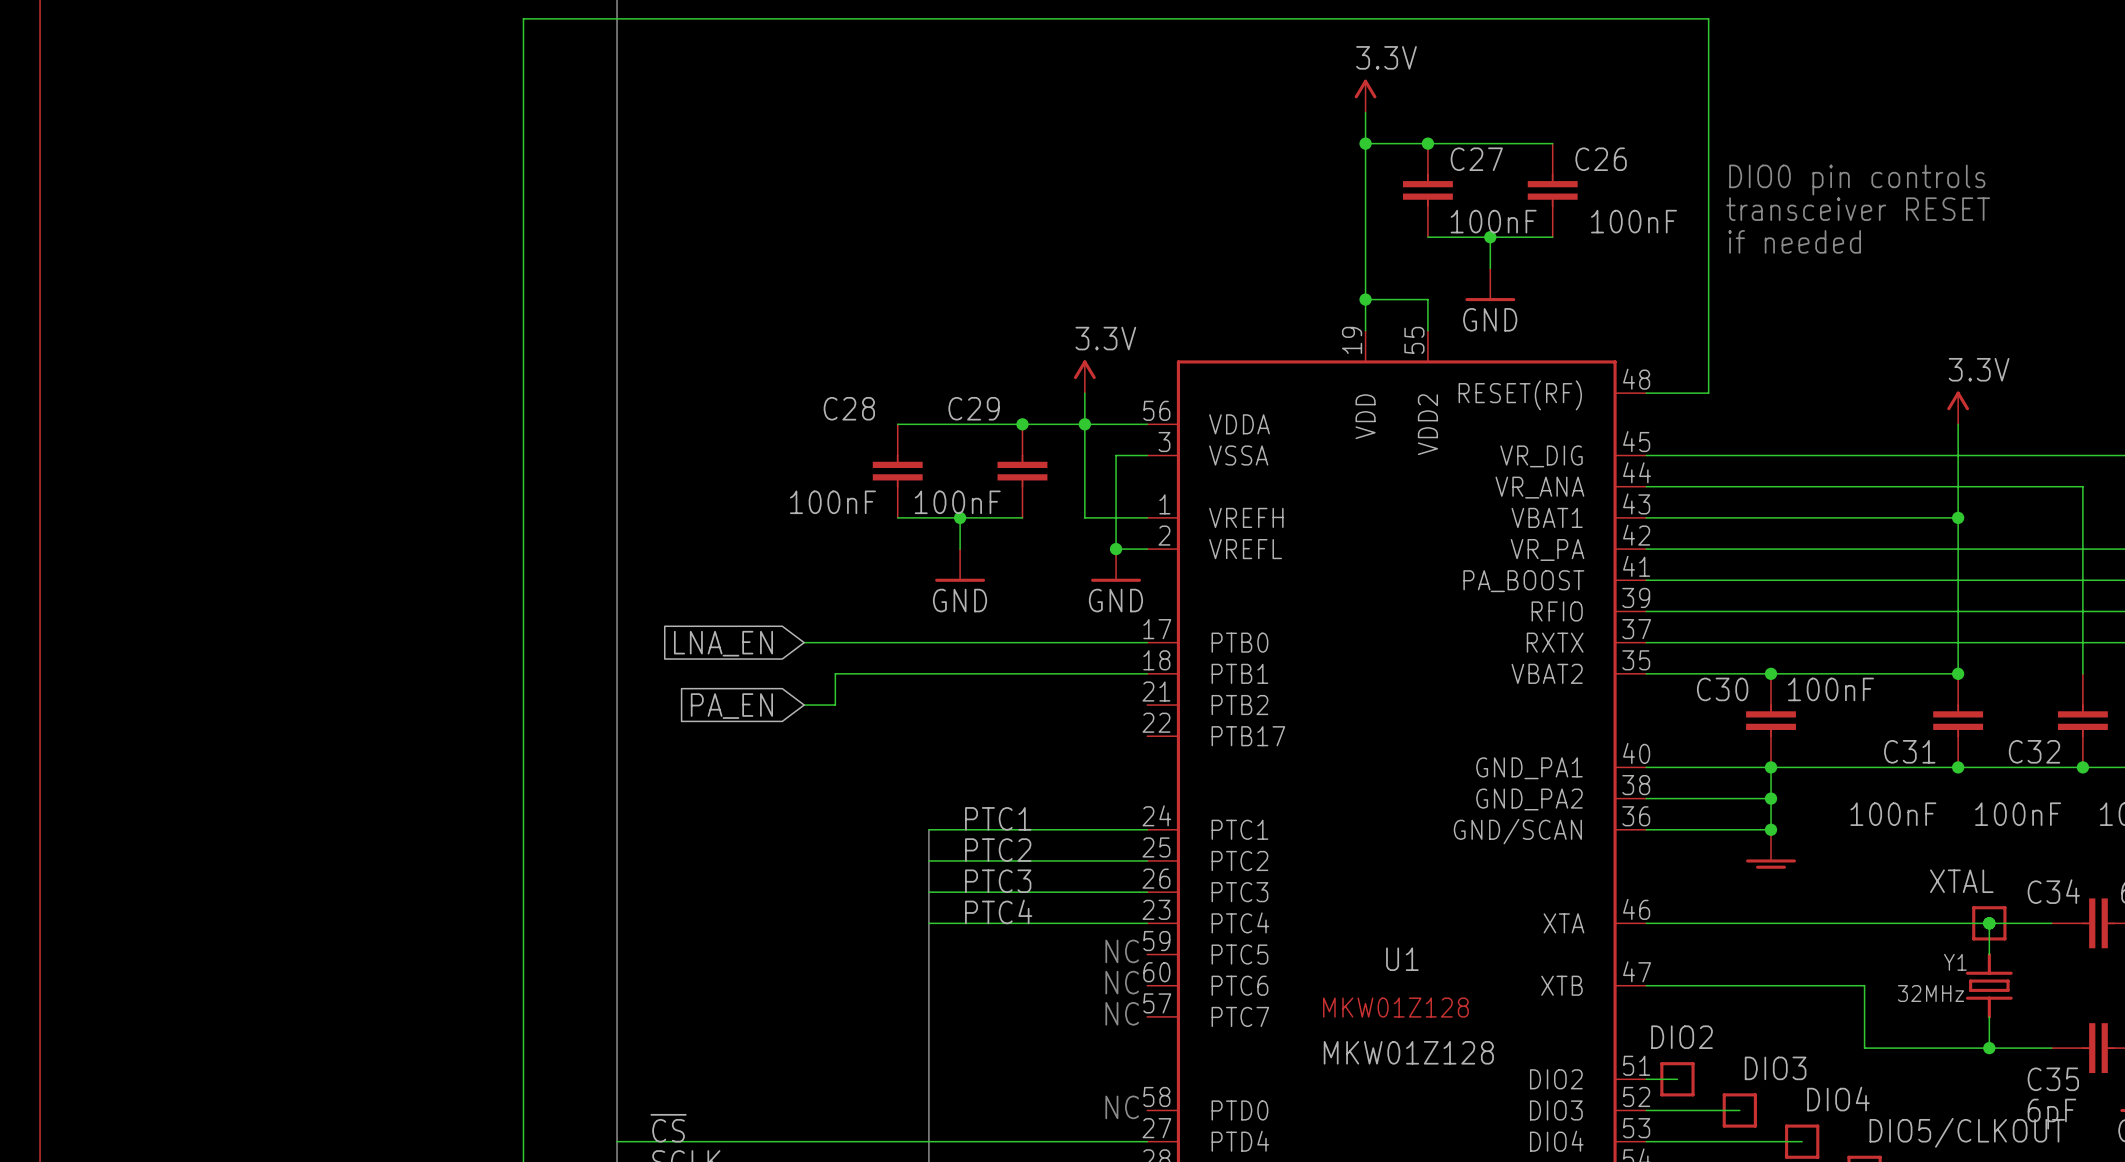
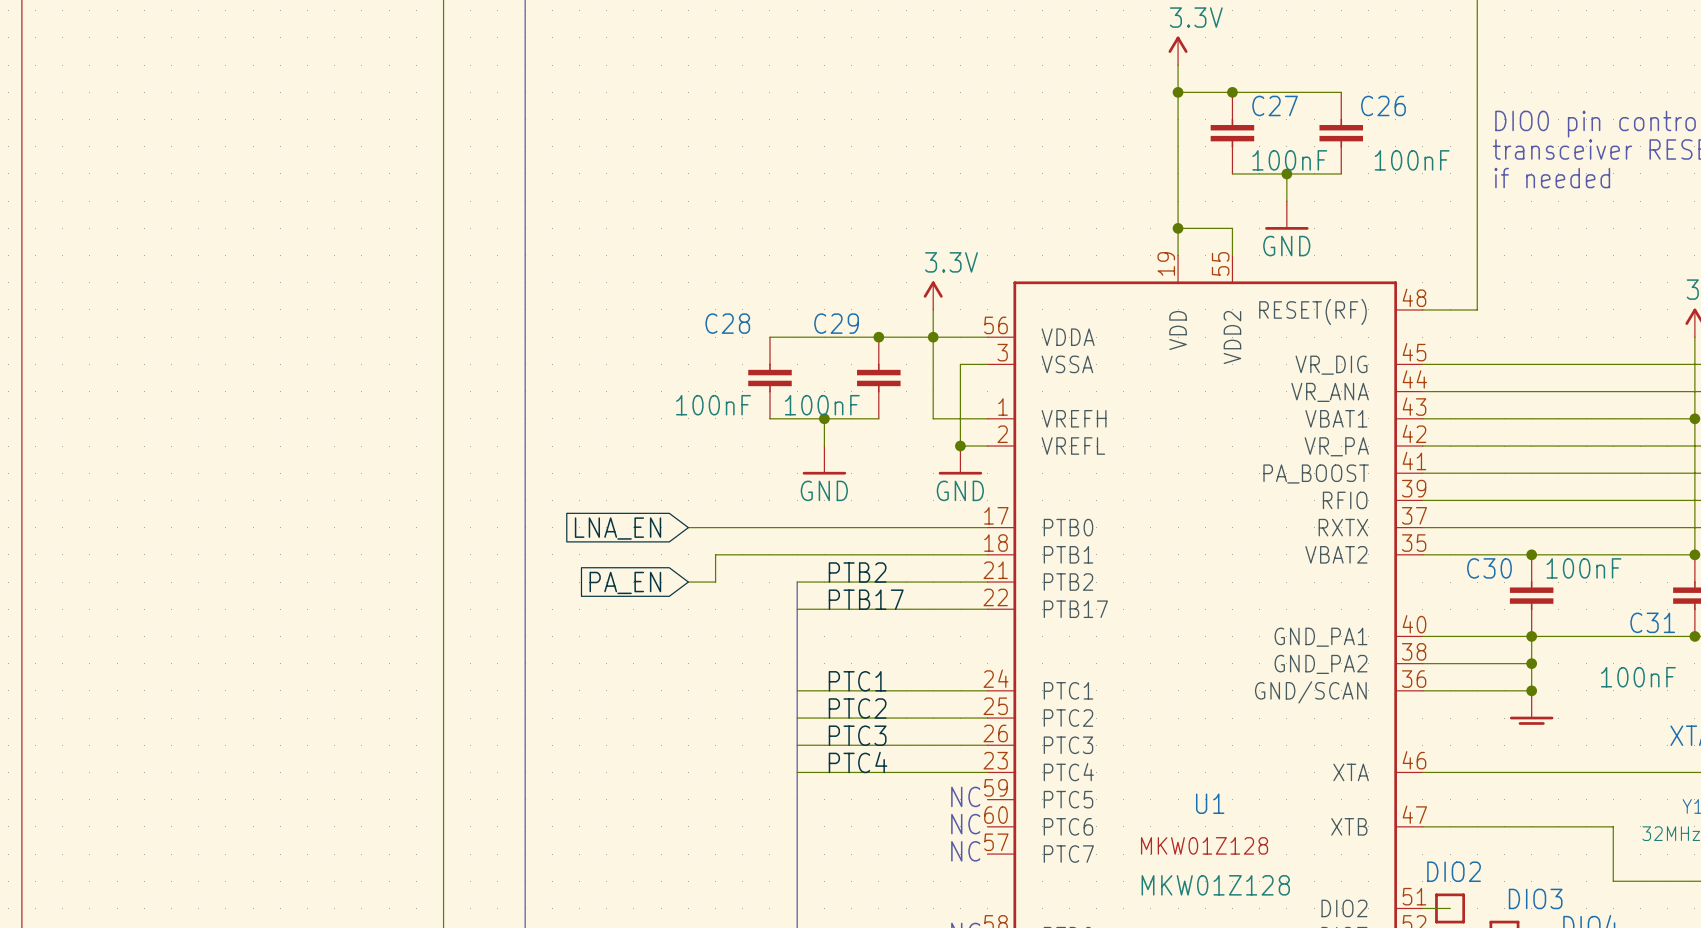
label: none -> PTB2 (857, 572)
bus: none -> (797, 582) (797, 690)
wire: none -> (797, 582) (987, 582)
label: none -> PTB17 (866, 599)
wire: none -> (797, 609) (987, 609)

